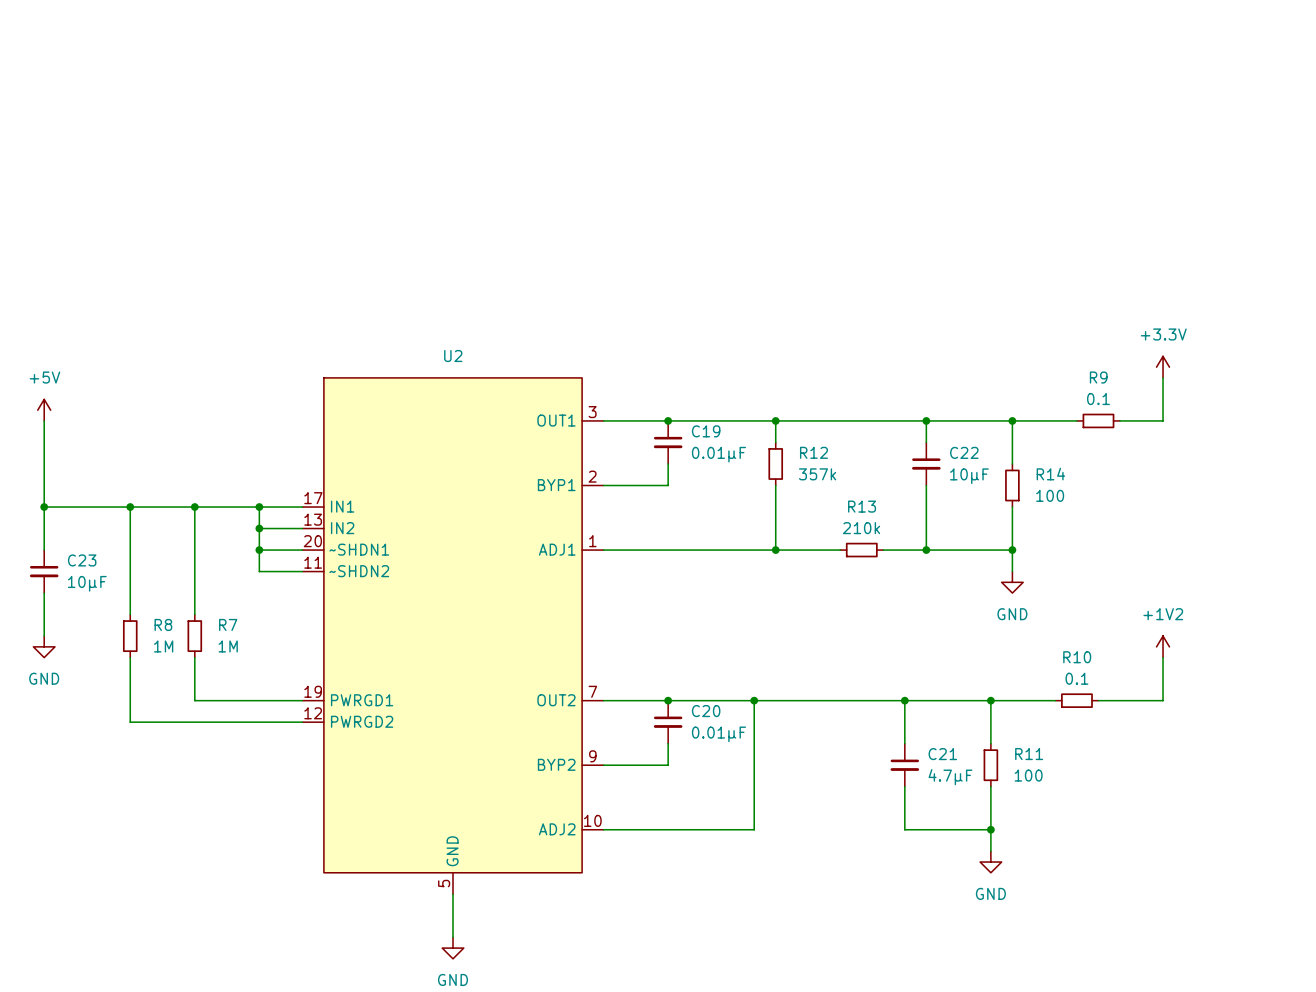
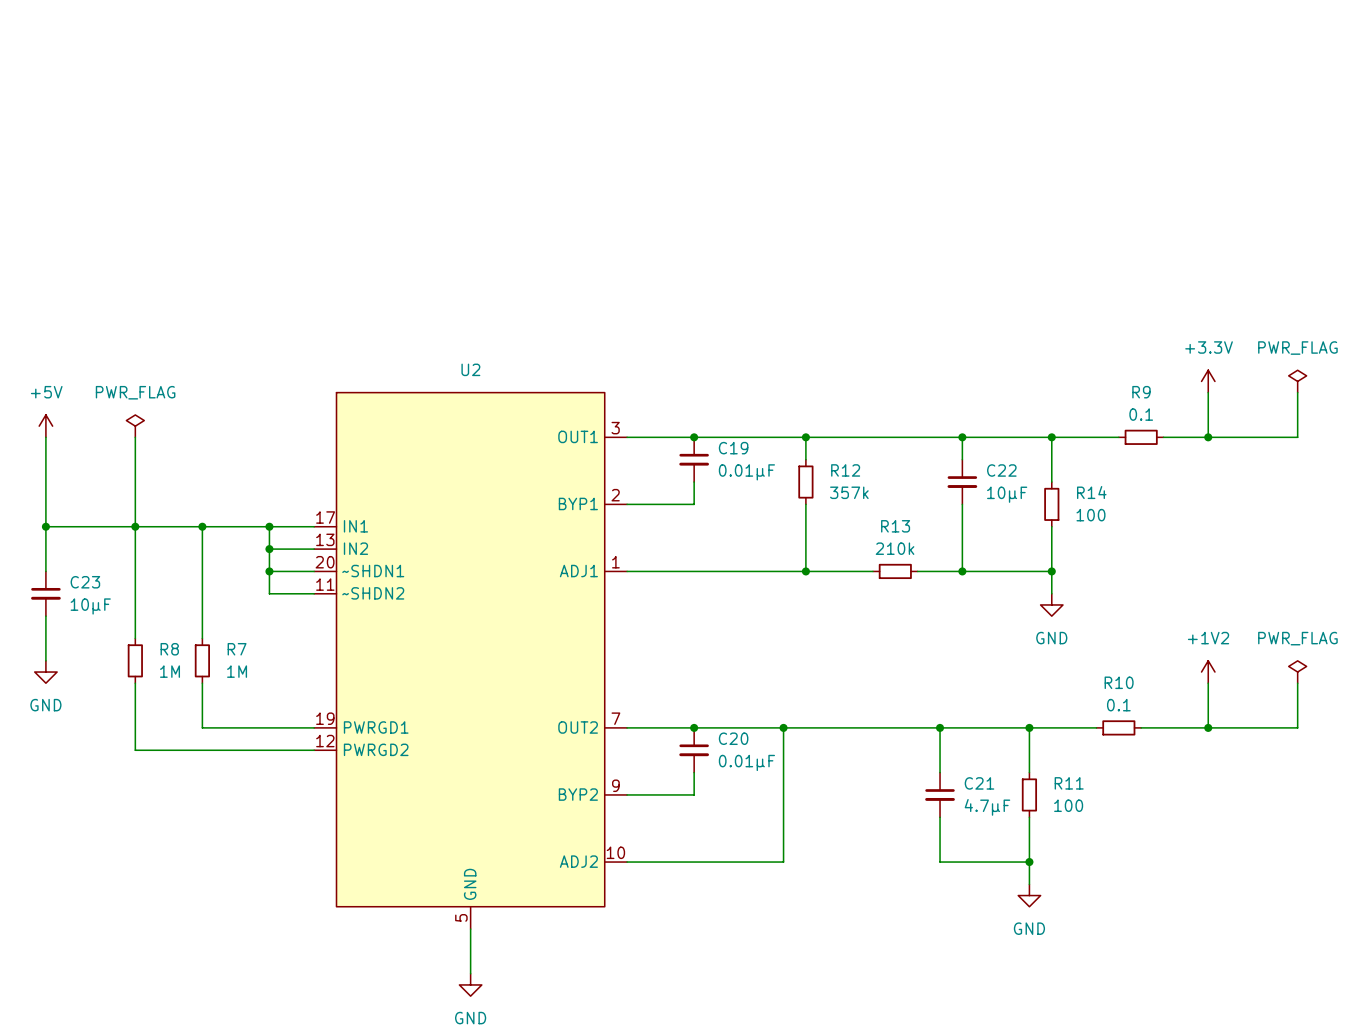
power symbol: none -> PWR_FLAG (1297, 381)
wire: none -> (1297, 392) (1297, 437) (1208, 437)
power symbol: none -> PWR_FLAG (135, 426)
wire: none -> (135, 437) (135, 526)
junction: none -> (1208, 437)
power symbol: none -> PWR_FLAG (1297, 672)
wire: none -> (1297, 683) (1297, 727) (1208, 727)
junction: none -> (1208, 727)

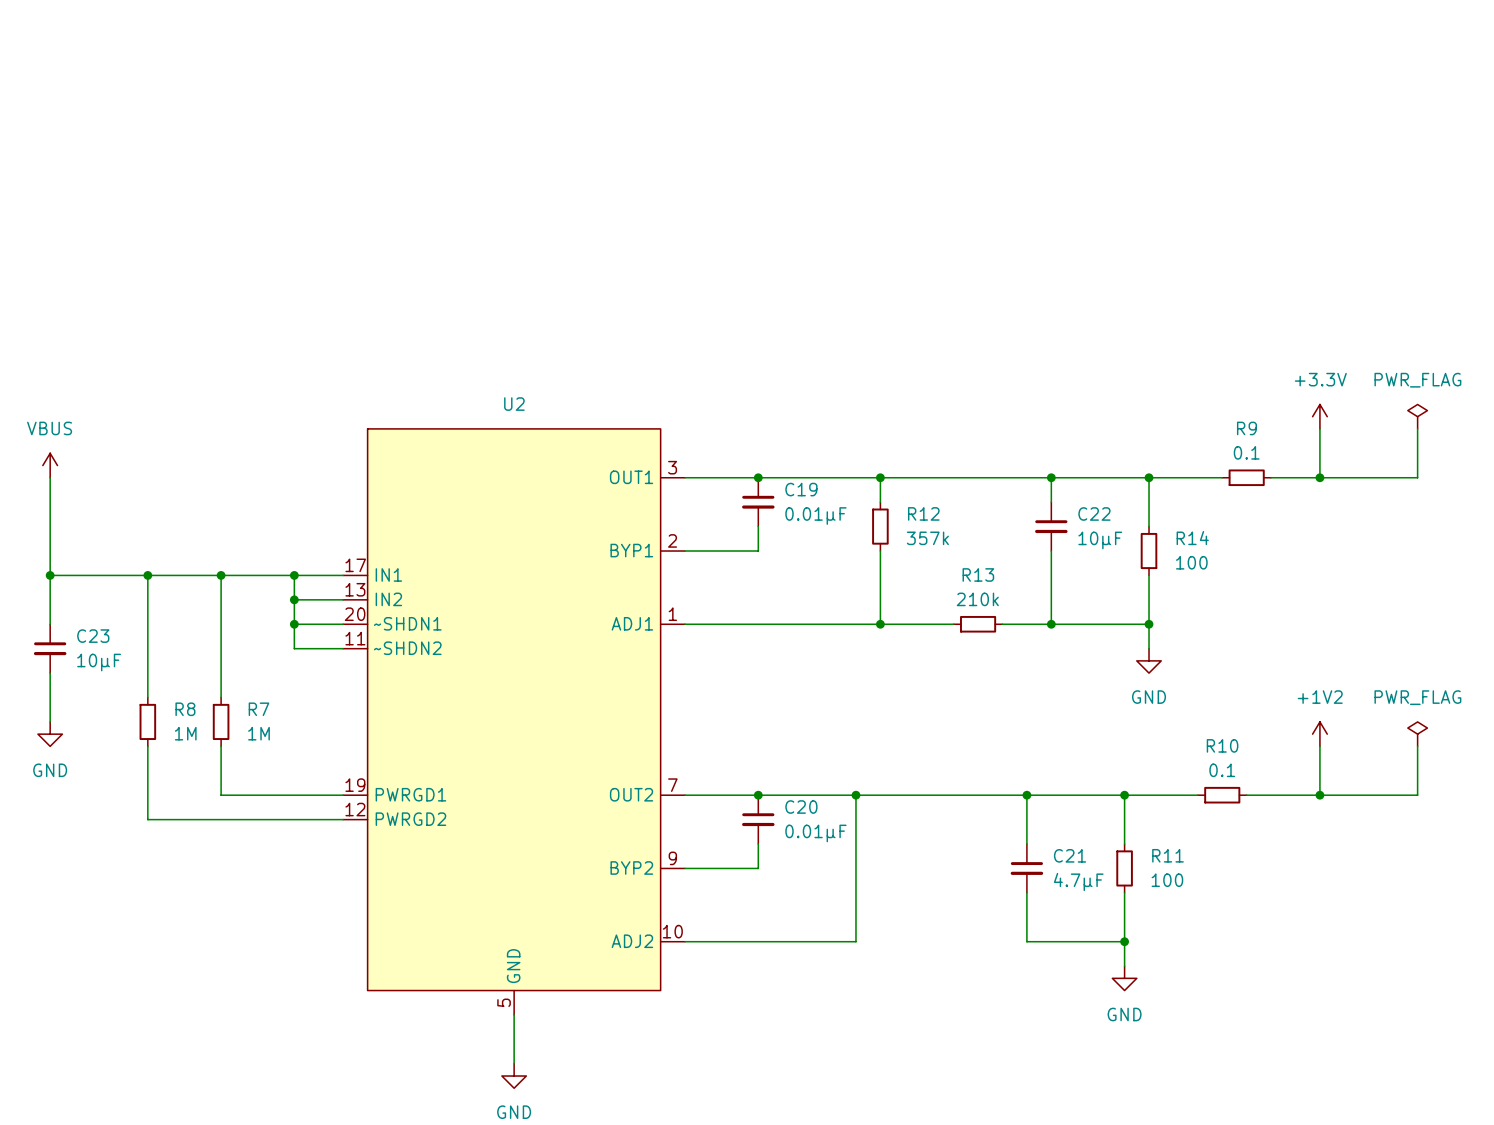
power symbol: +5V (45, 426) -> VBUS (50, 465)
power symbol: PWR_FLAG (135, 426) -> none
wire: (135, 437) (135, 526) -> none

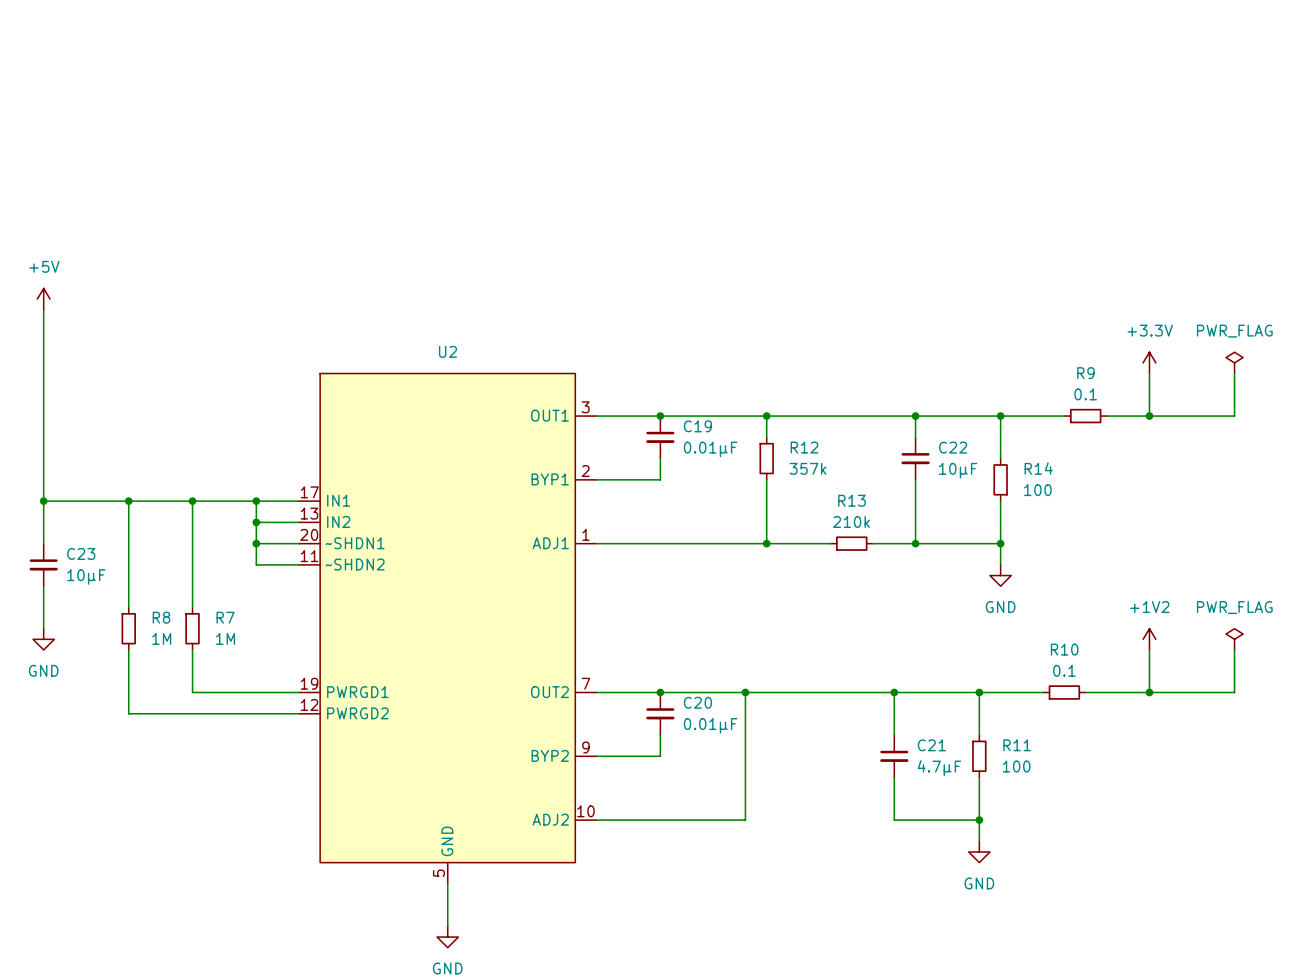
power symbol: none -> +5V (43, 299)
wire: none -> (43, 309) (43, 416)
power symbol: VBUS (50, 465) -> none

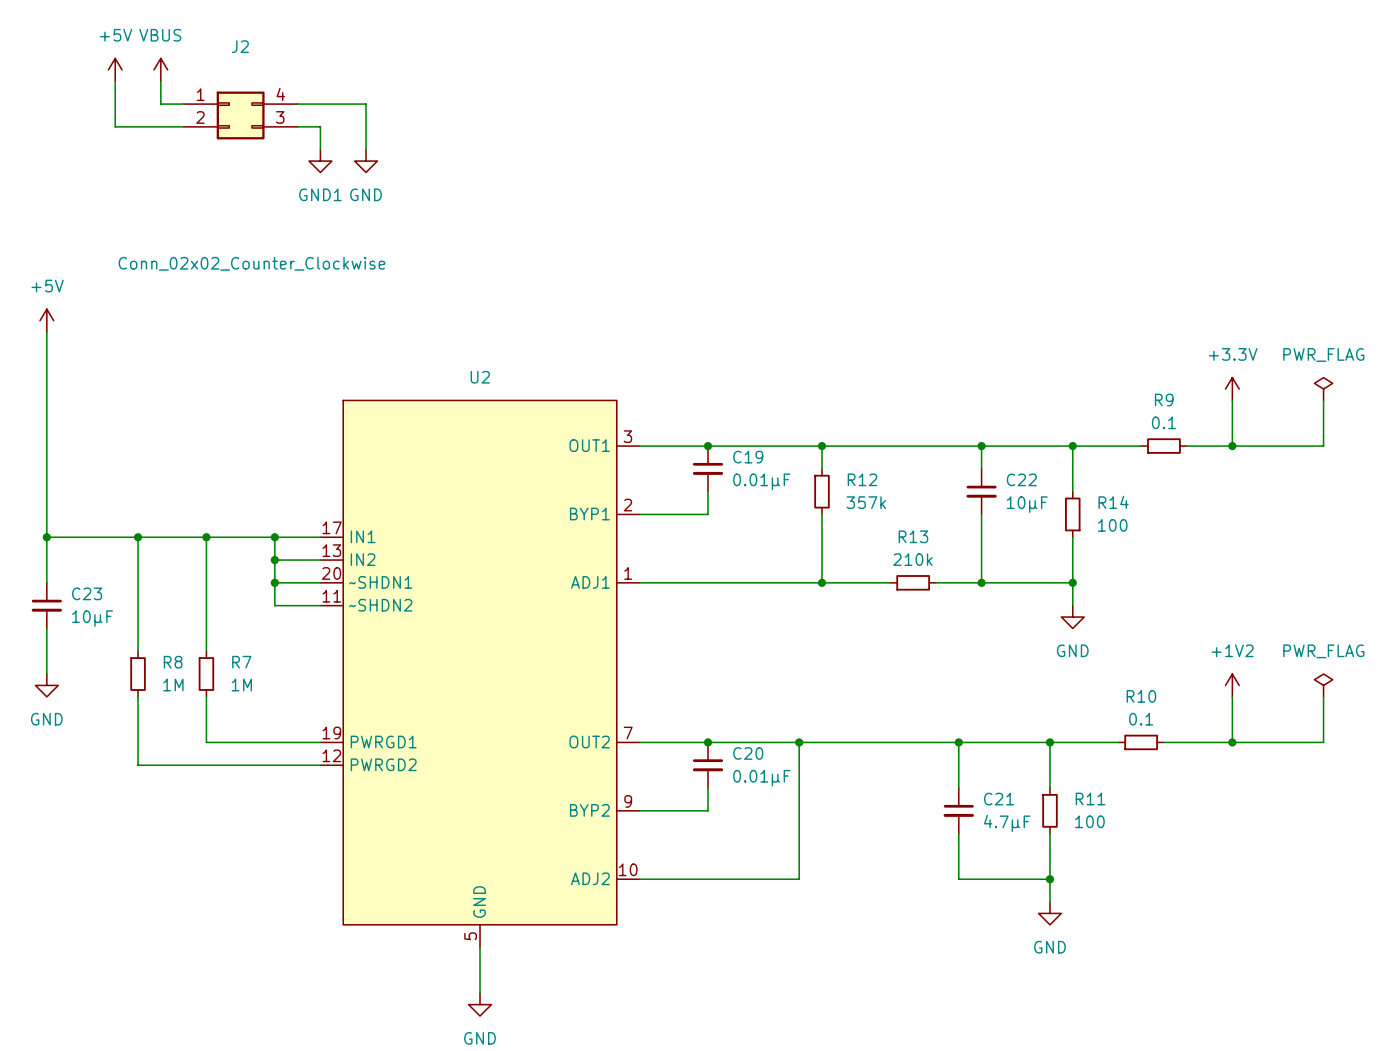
power symbol: none -> +5V (115, 69)
power symbol: none -> VBUS (160, 69)
wire: none -> (115, 81) (115, 126) (183, 126)
wire: none -> (160, 81) (160, 104) (183, 104)
wire: none -> (297, 104) (366, 104) (366, 149)
J2: none -> Conn_02x02_Counter_Clockwise (240, 115)
wire: none -> (297, 126) (320, 126) (320, 149)
power symbol: none -> GND1 (320, 161)
power symbol: none -> GND (366, 161)

